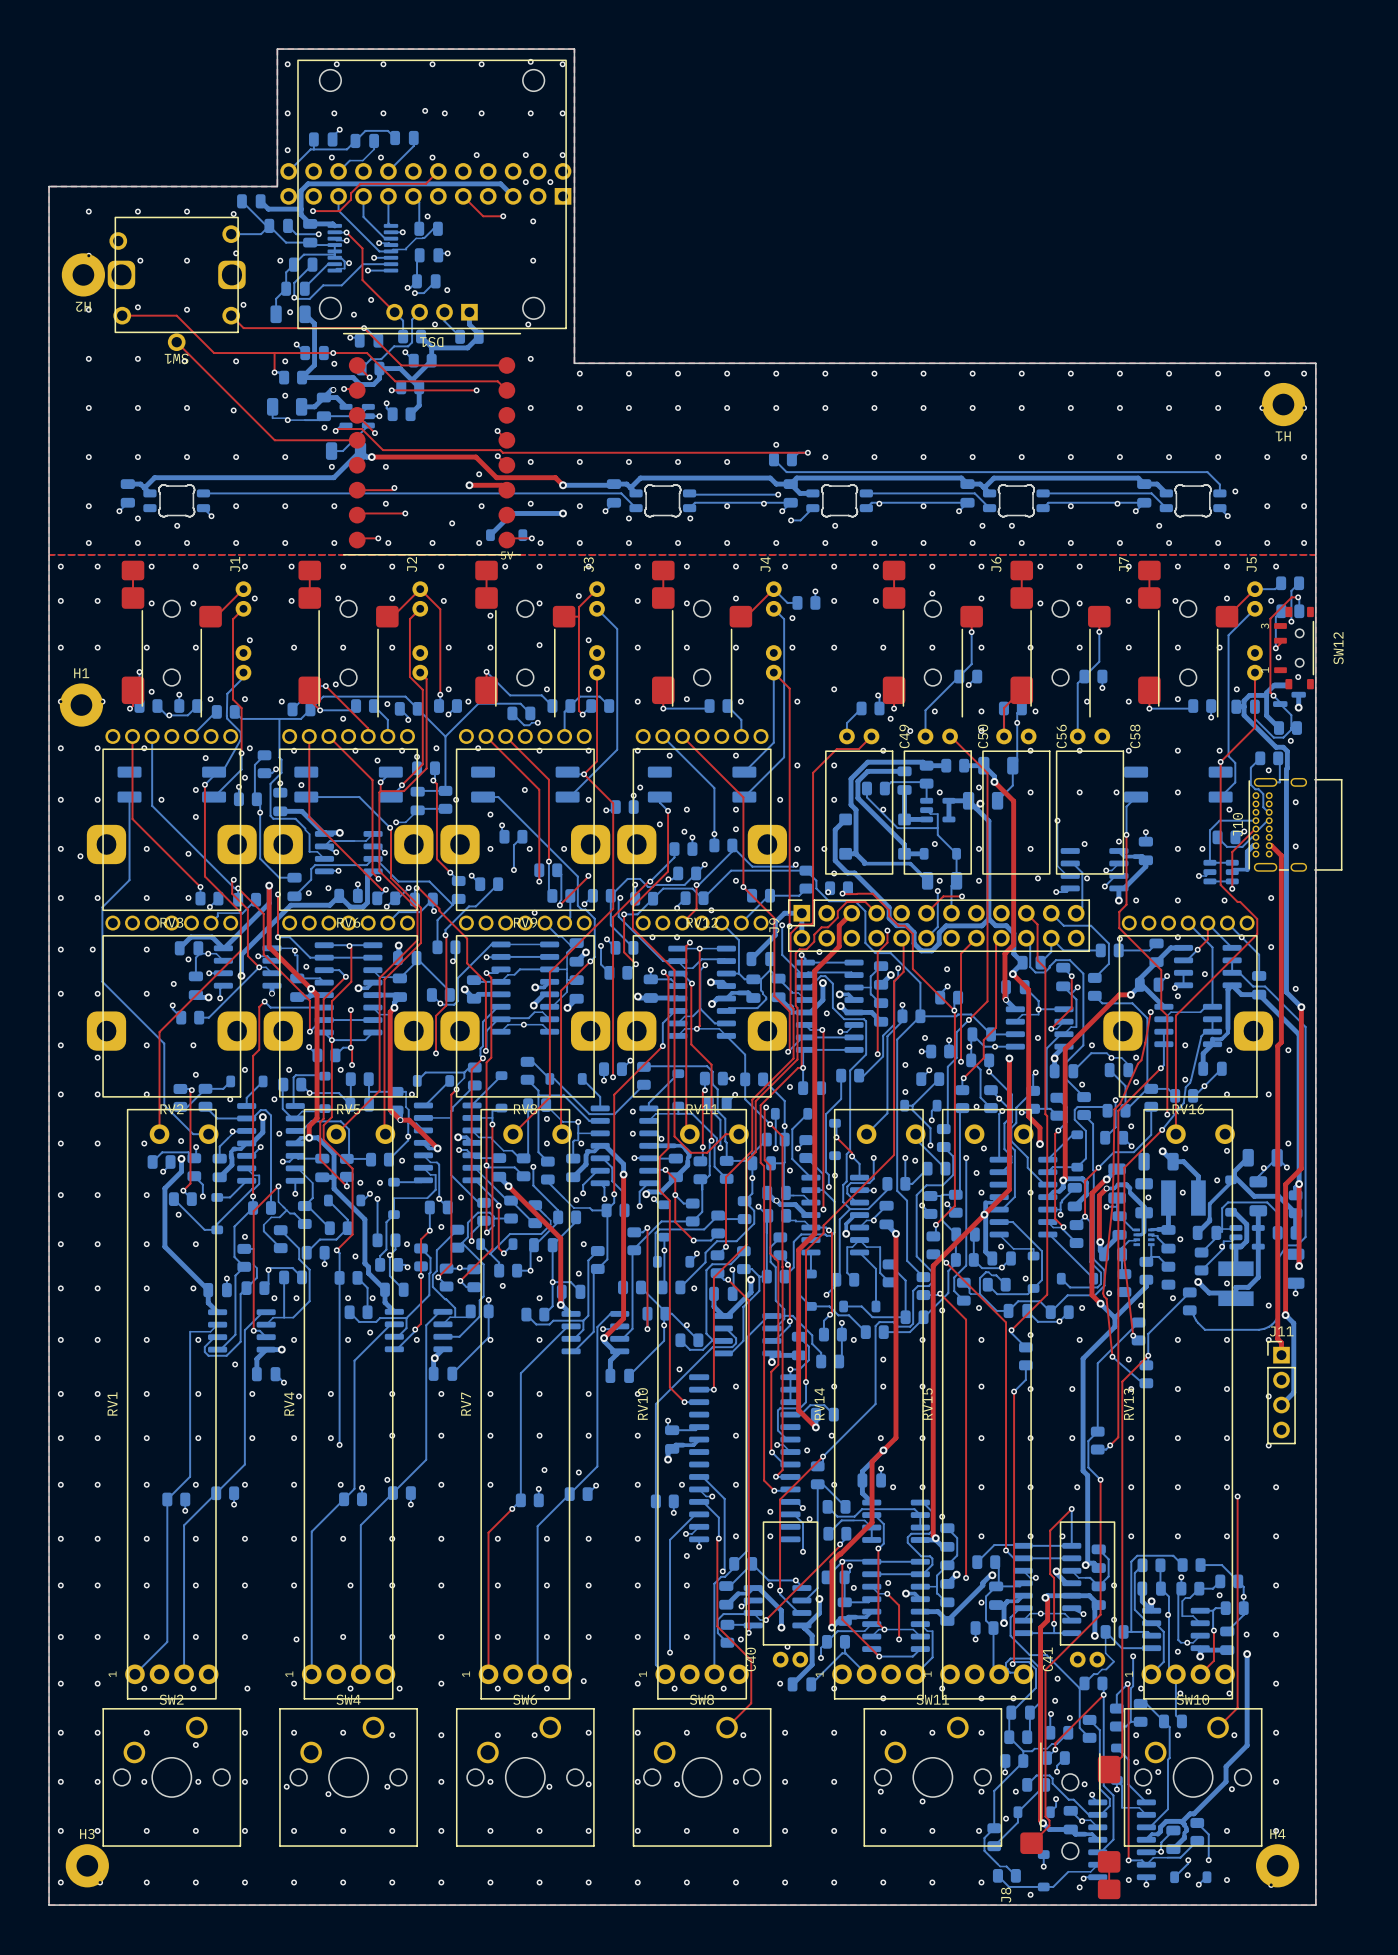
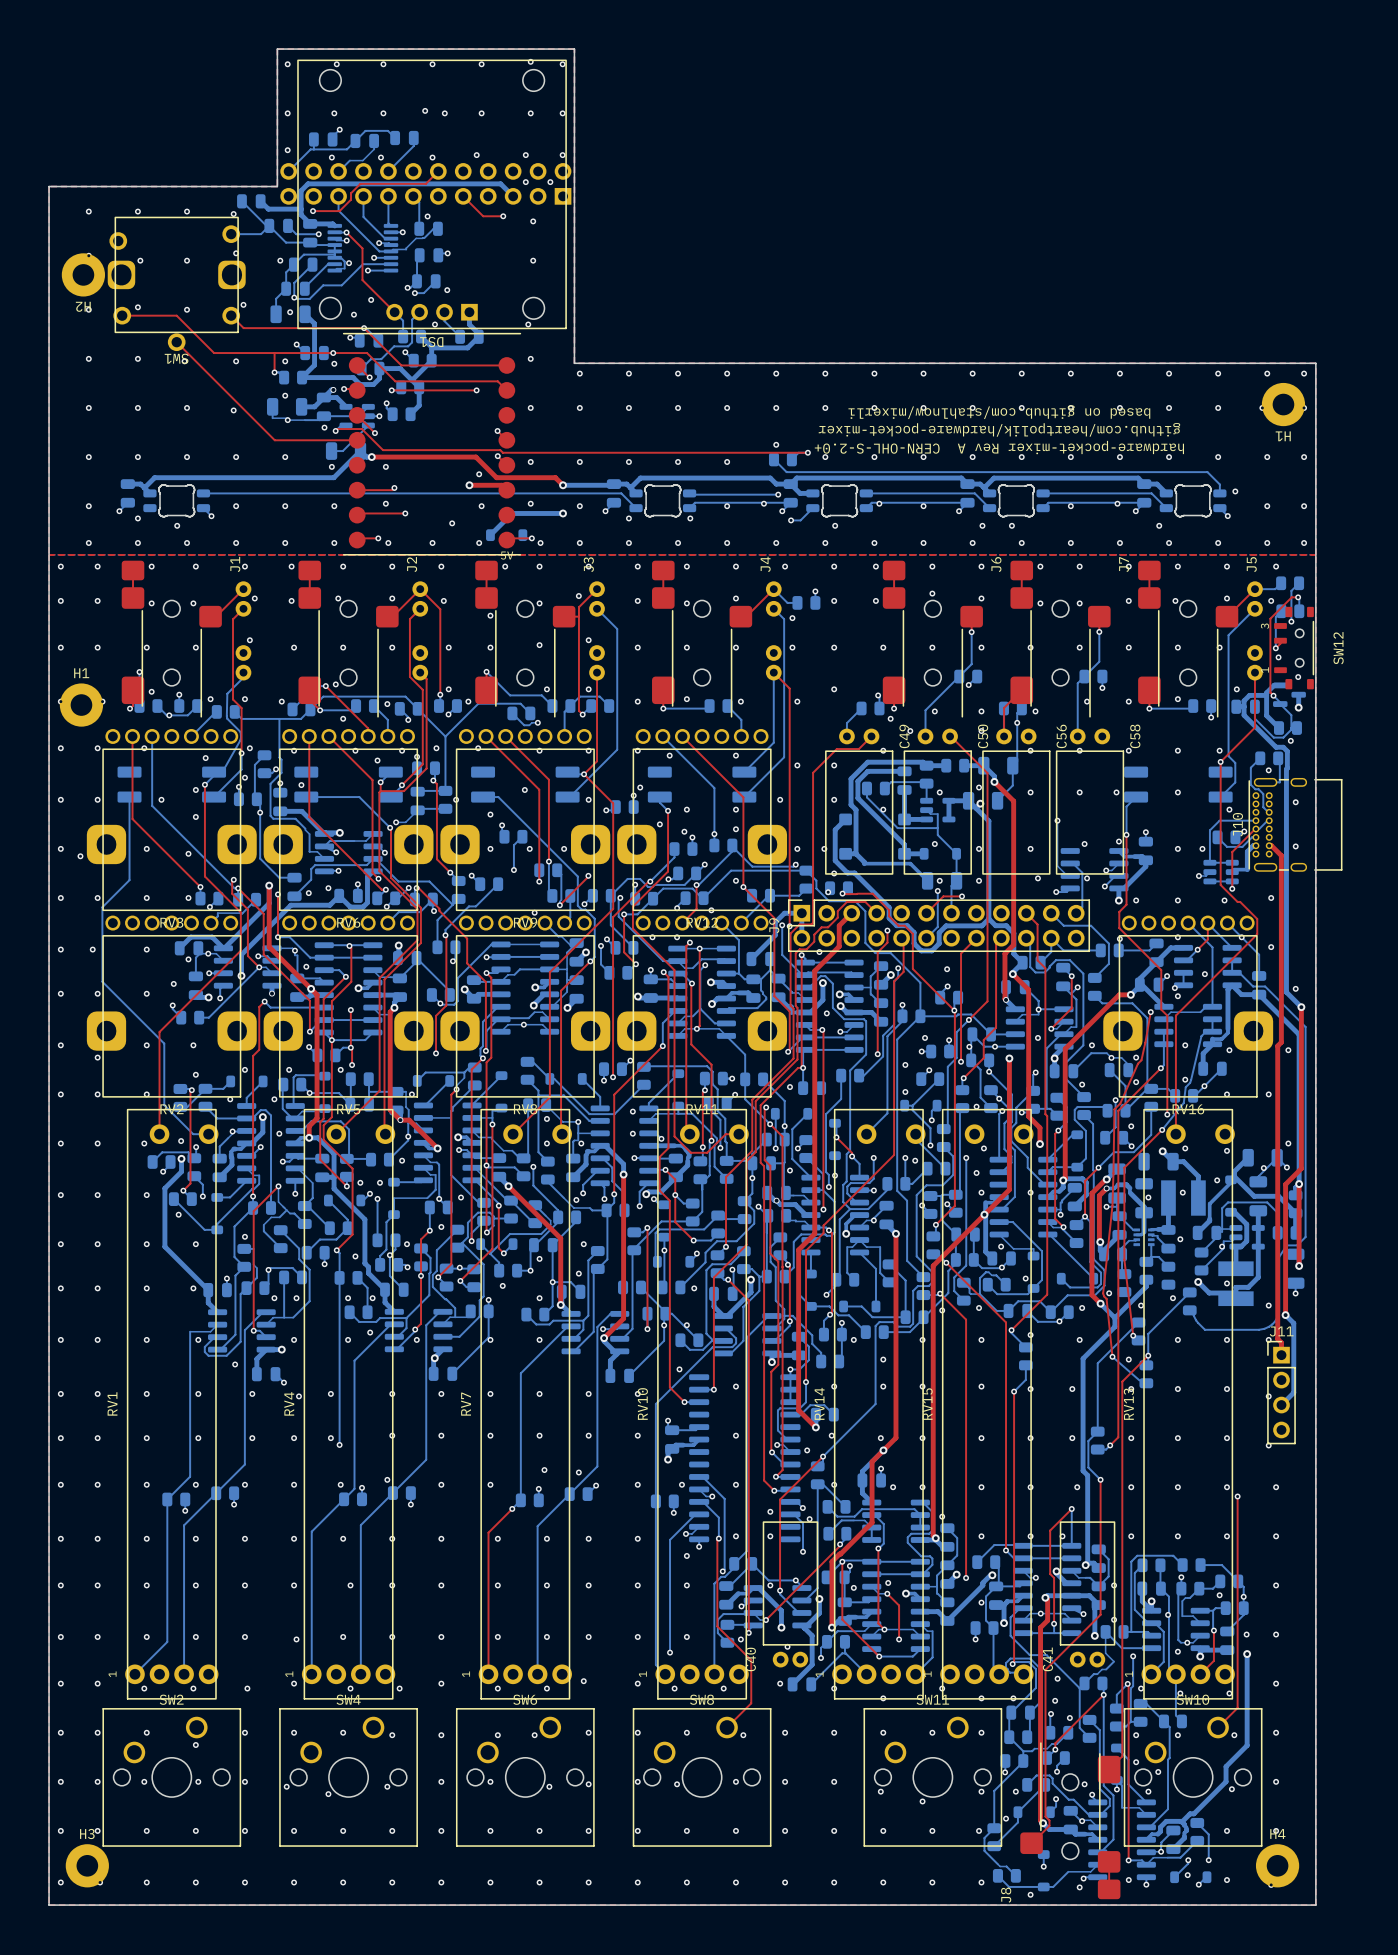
text: none -> based on github.com/stahlnow/mixerli (999, 412)
text: none -> github.com/heartpolik/hardware-pocket-mixer (999, 429)
text: none -> hardware-pocket-mixer Rev A CERN-OHL-S-2.0+ (999, 447)

